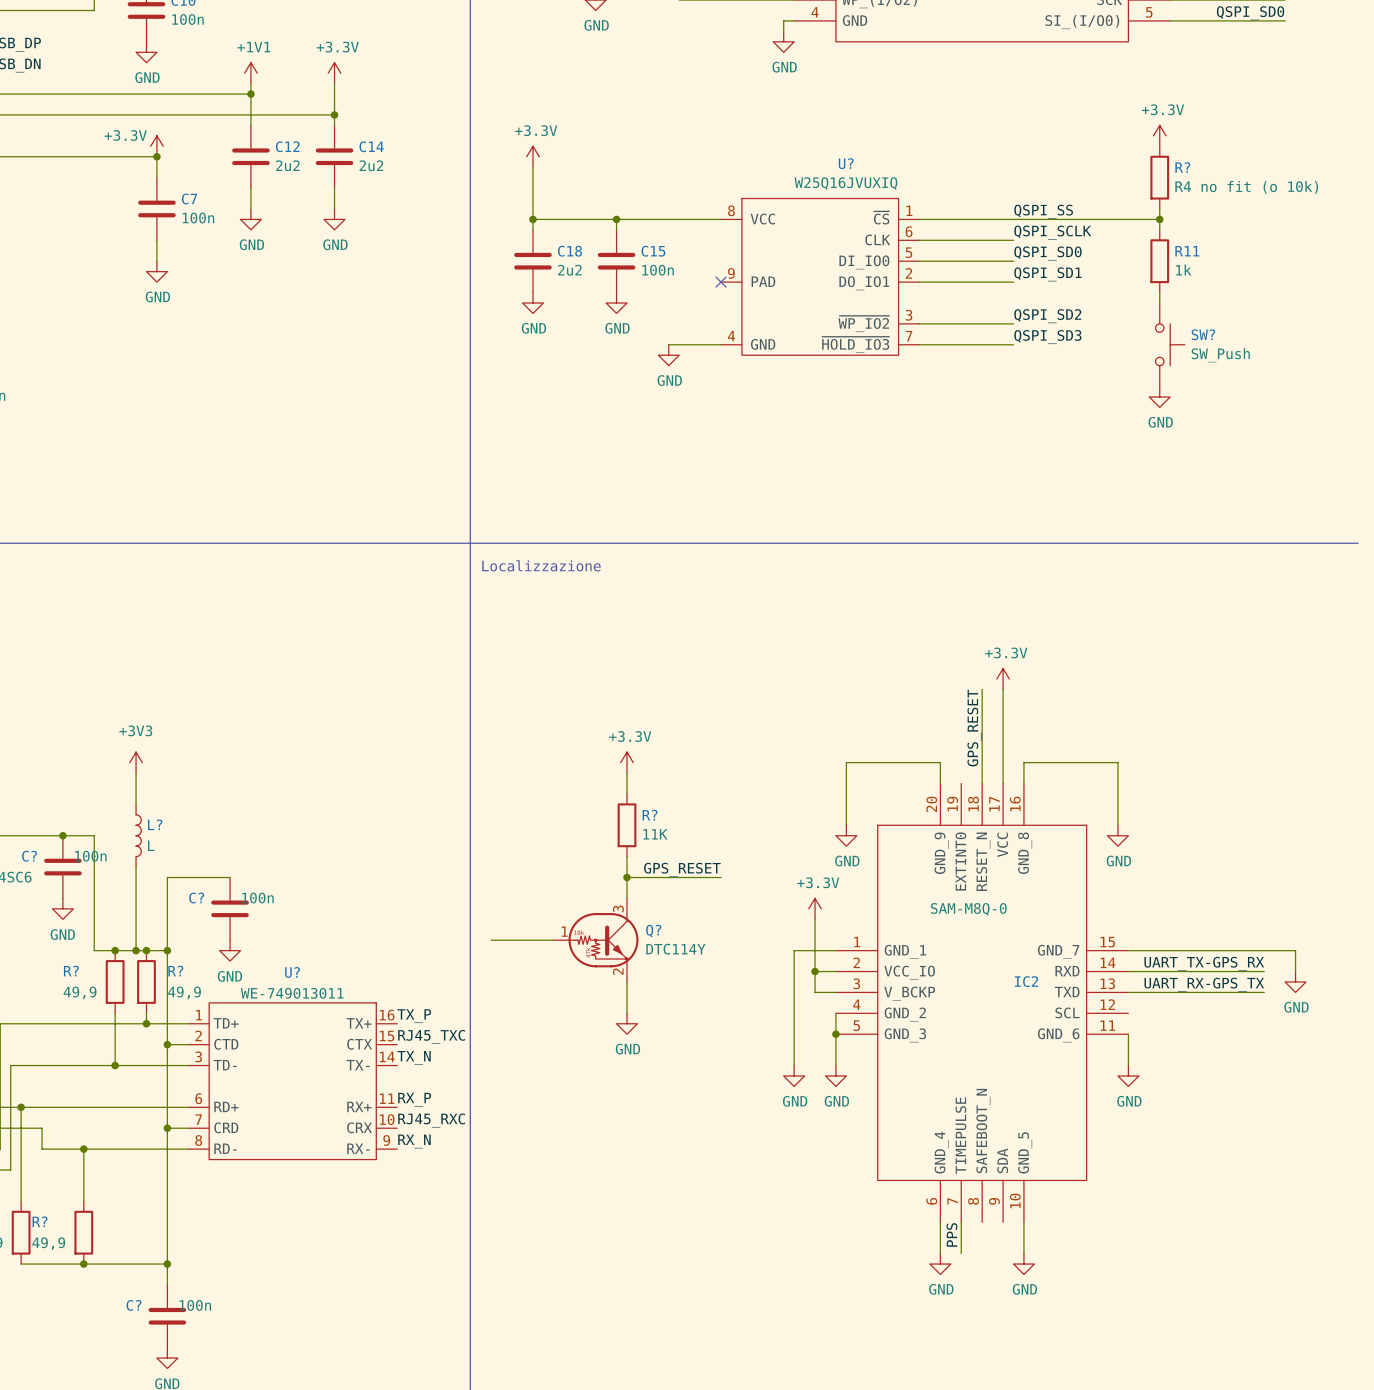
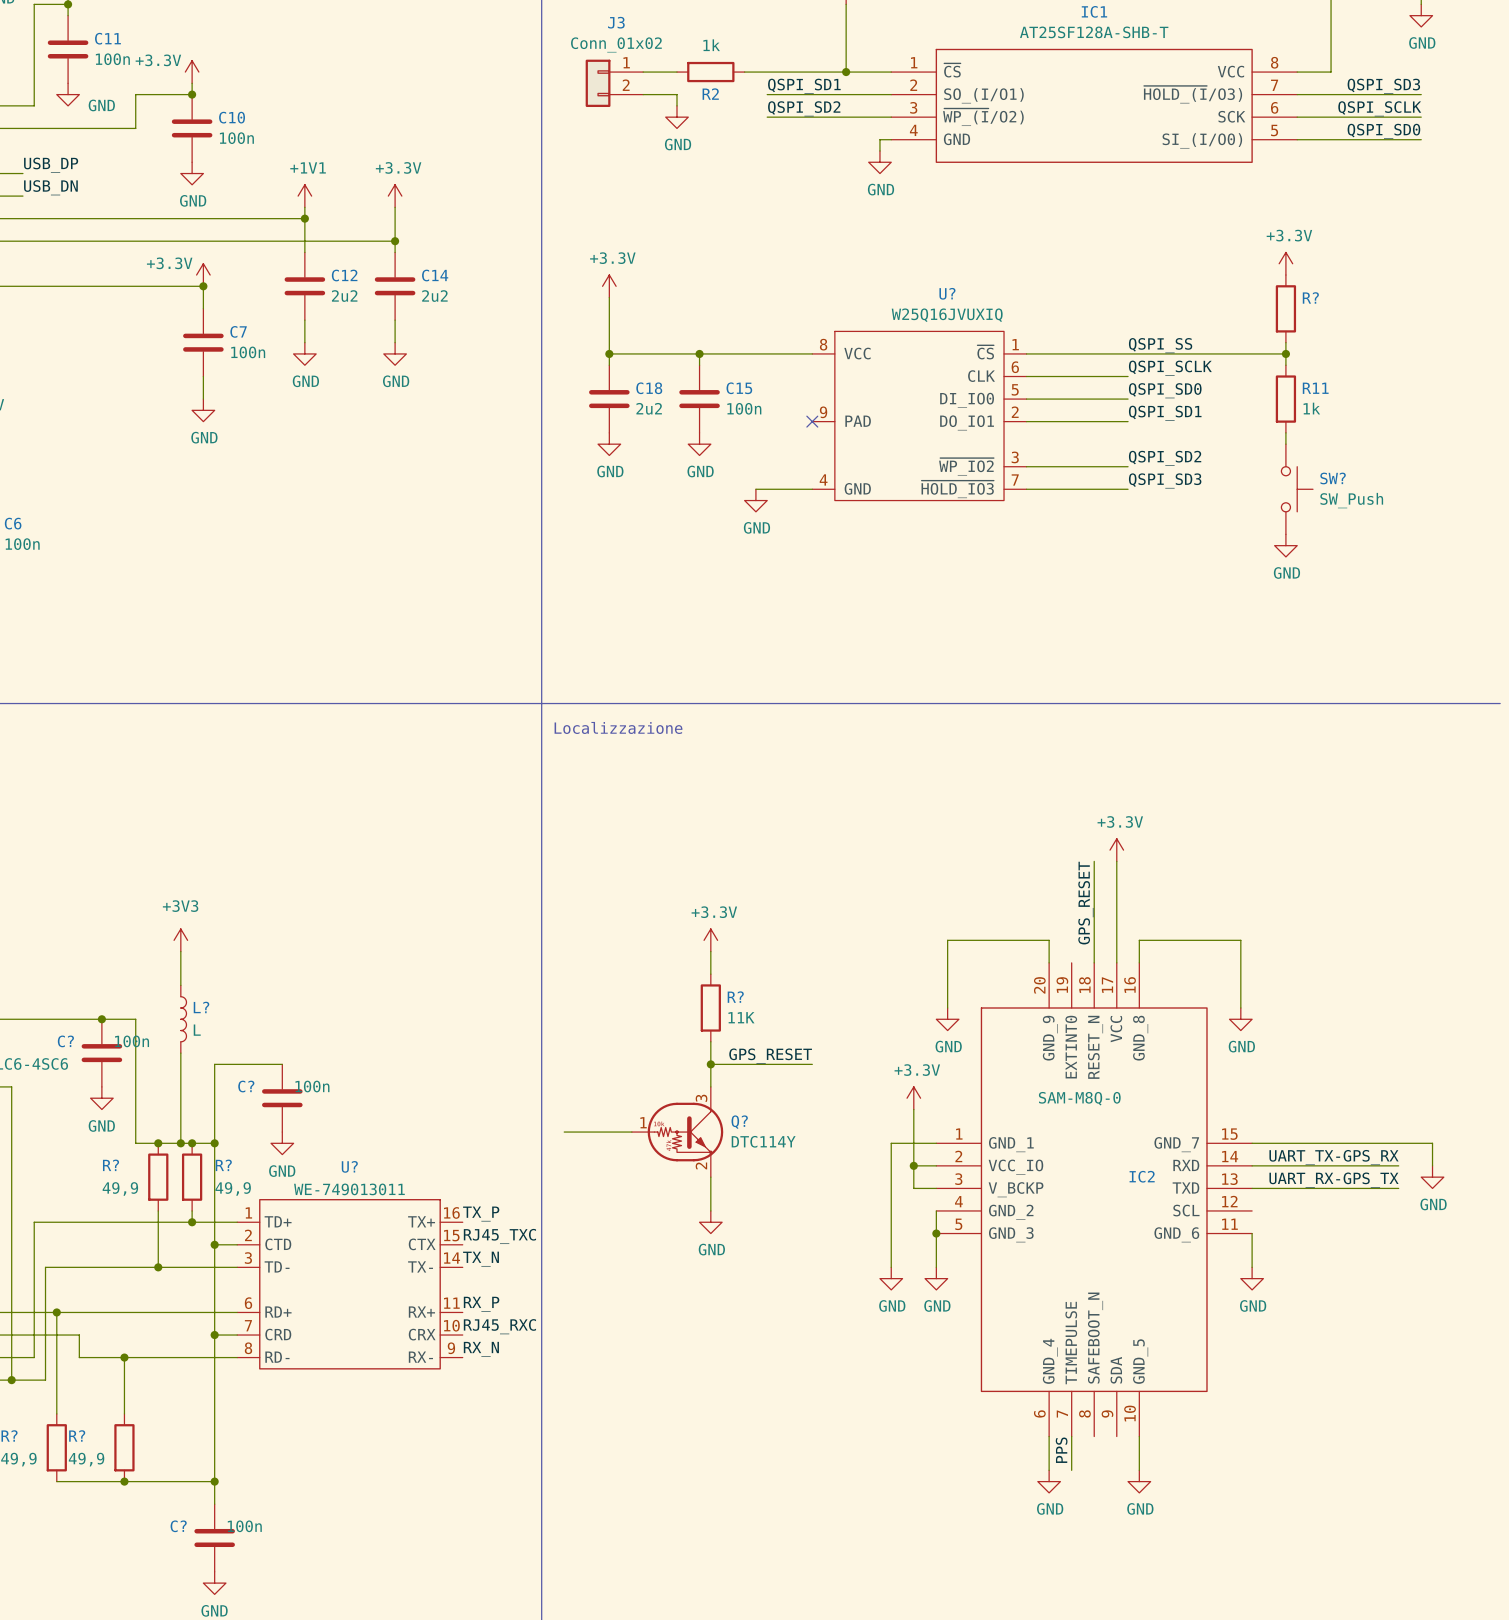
R? value: R4 no fit (o 10k) (1246, 187) -> none

